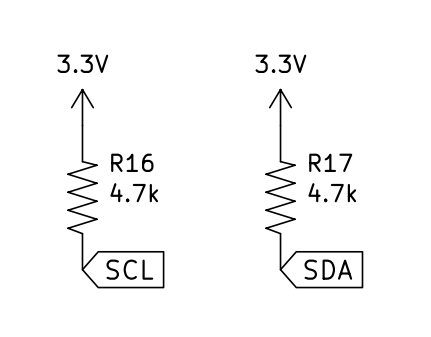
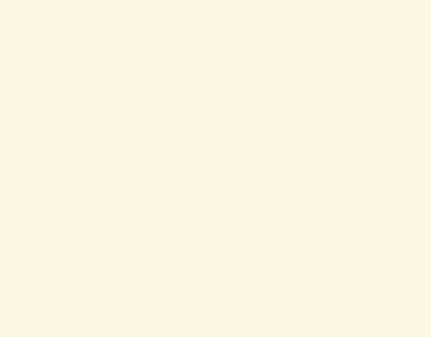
power symbol: 3.3V (82, 107) -> none
power symbol: 3.3V (280, 107) -> none
R16: 4.7k (82, 197) -> none
R17: 4.7k (280, 197) -> none
global label: SCL (129, 269) -> none
global label: SDA (328, 269) -> none

